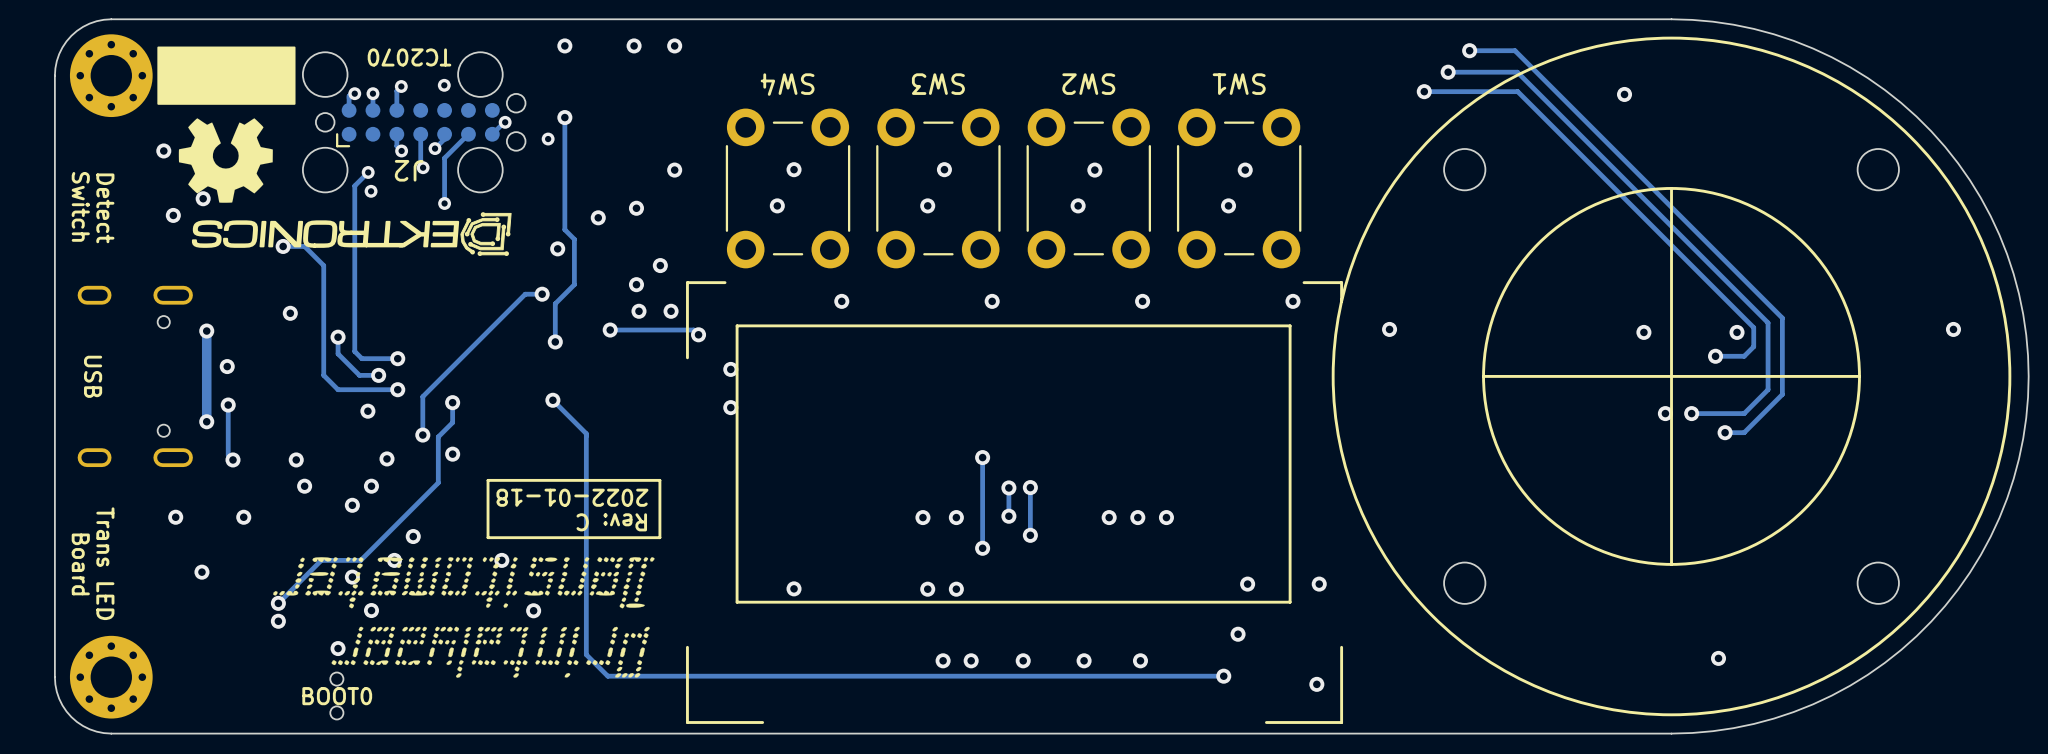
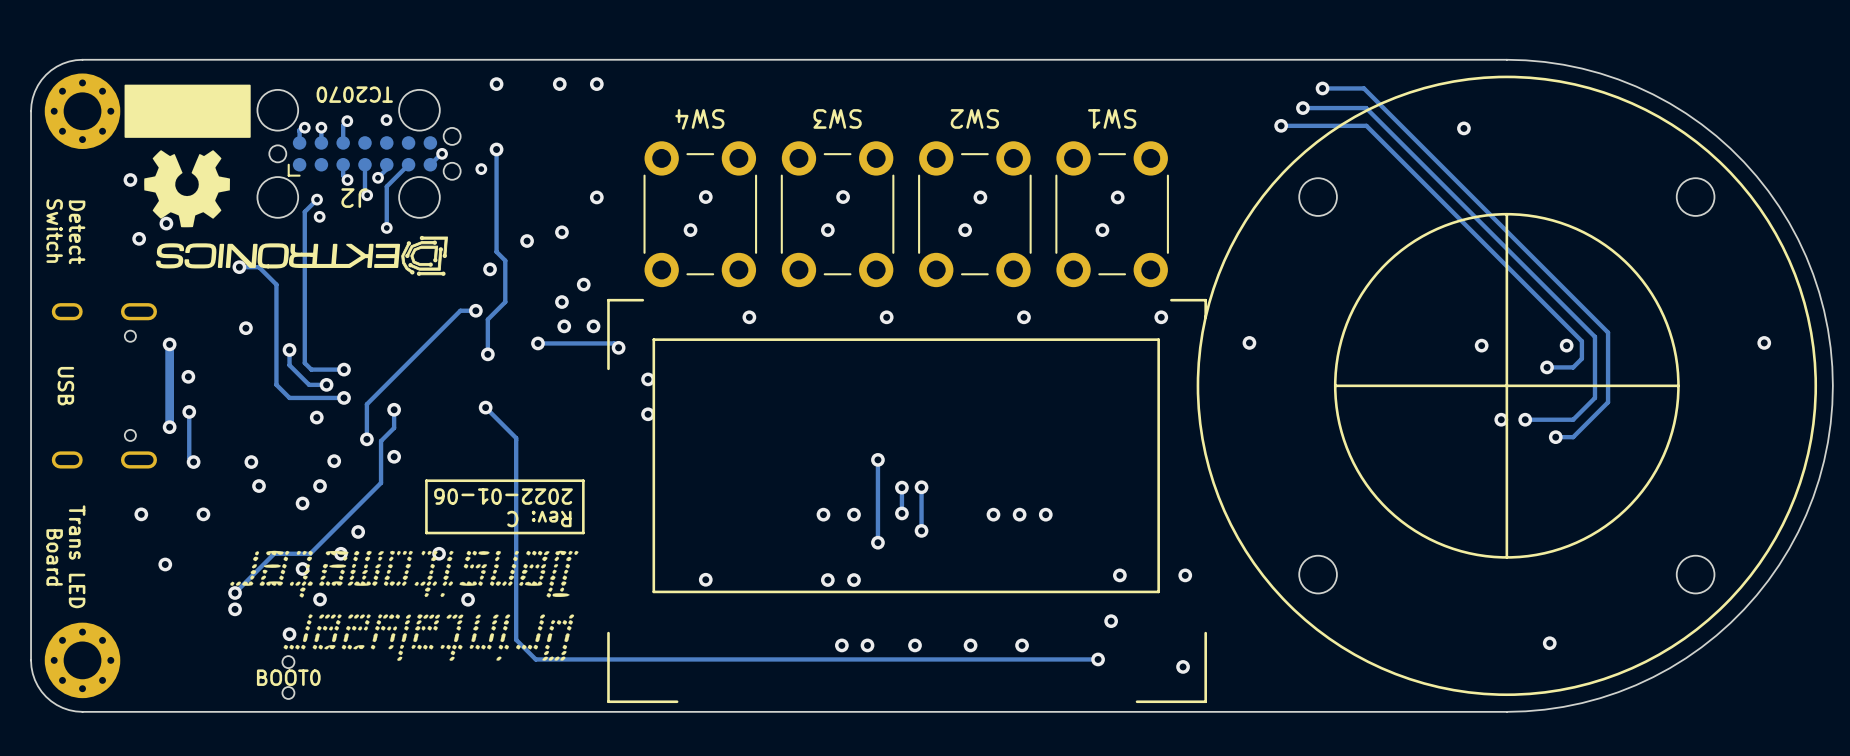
text: 2022-01-18 (572, 497) -> 2022-01-06 (503, 496)

